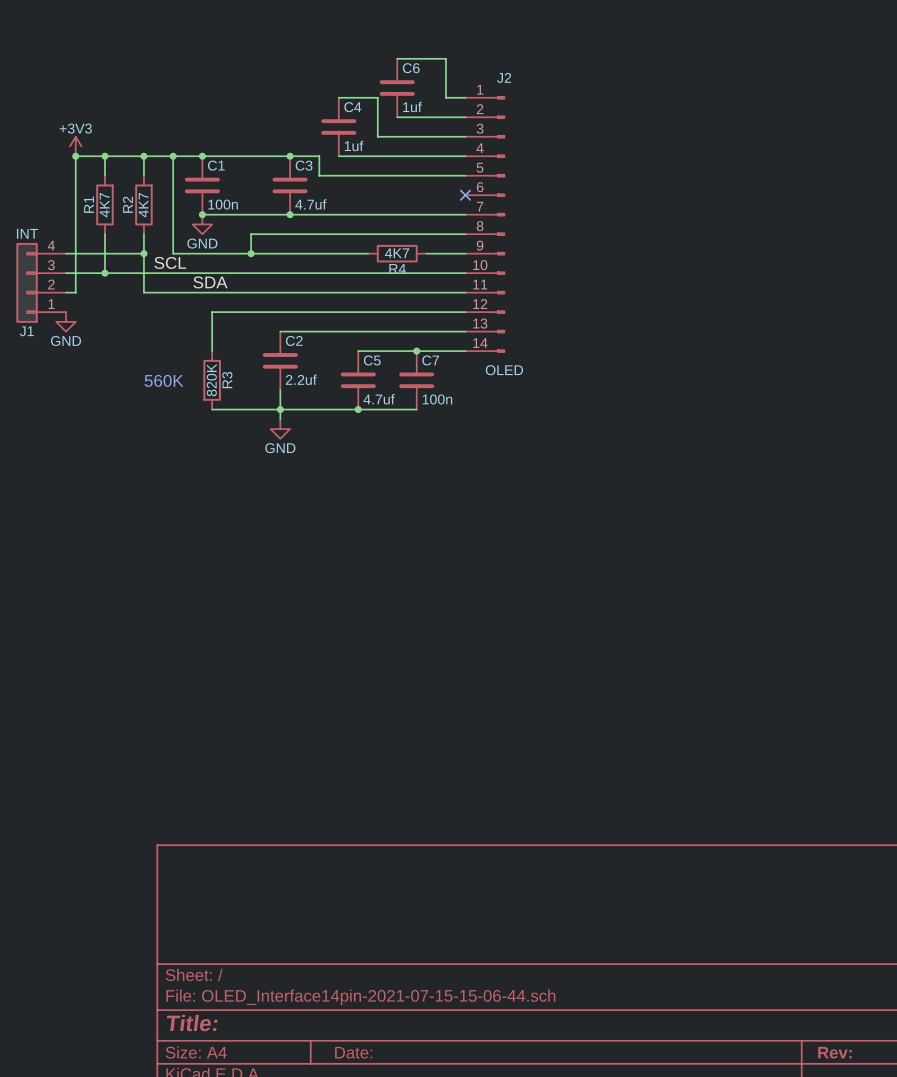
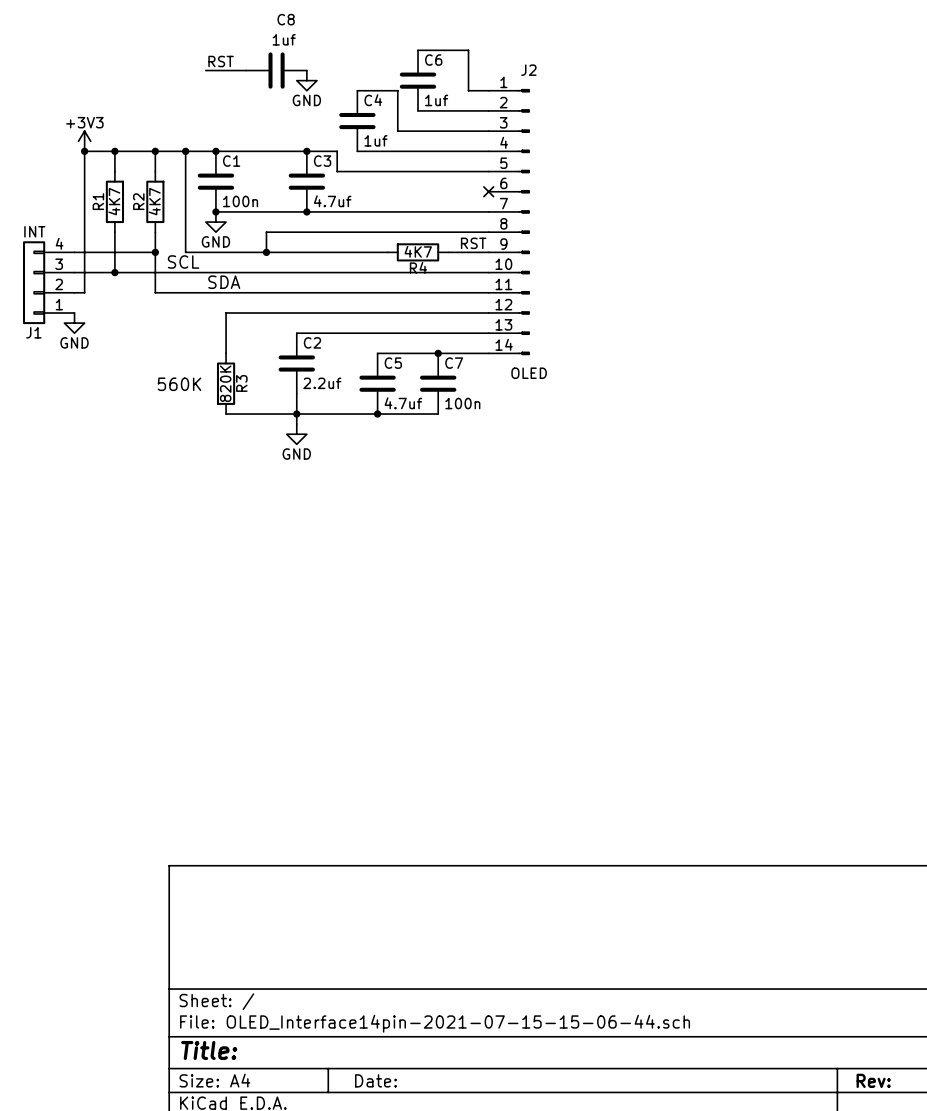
label: none -> RST (221, 61)
wire: none -> (205, 70) (246, 70)
C8: none -> 1uf (276, 70)
power symbol: none -> GND (306, 80)
label: none -> RST (473, 243)

